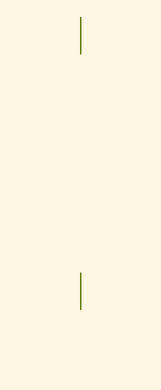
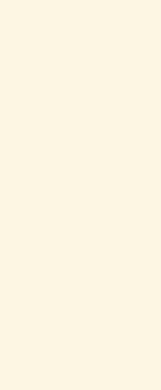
wire: (80, 17) (80, 53) -> none
wire: (80, 273) (80, 309) -> none

